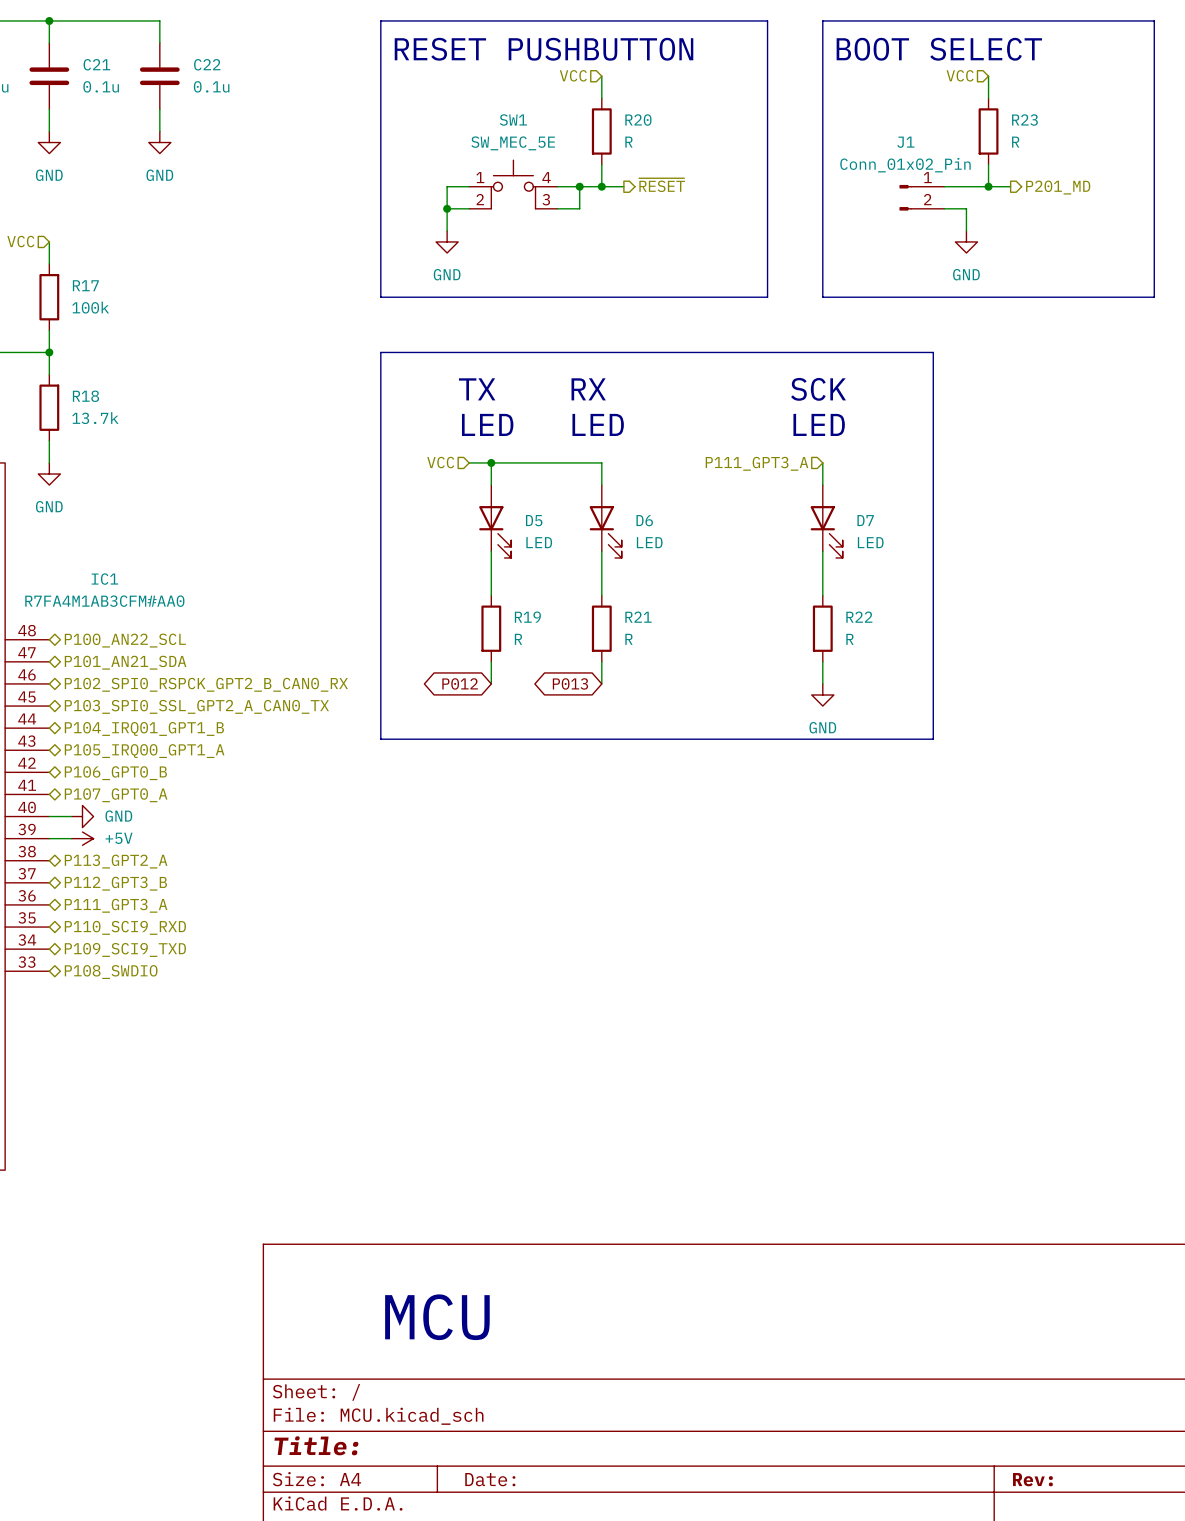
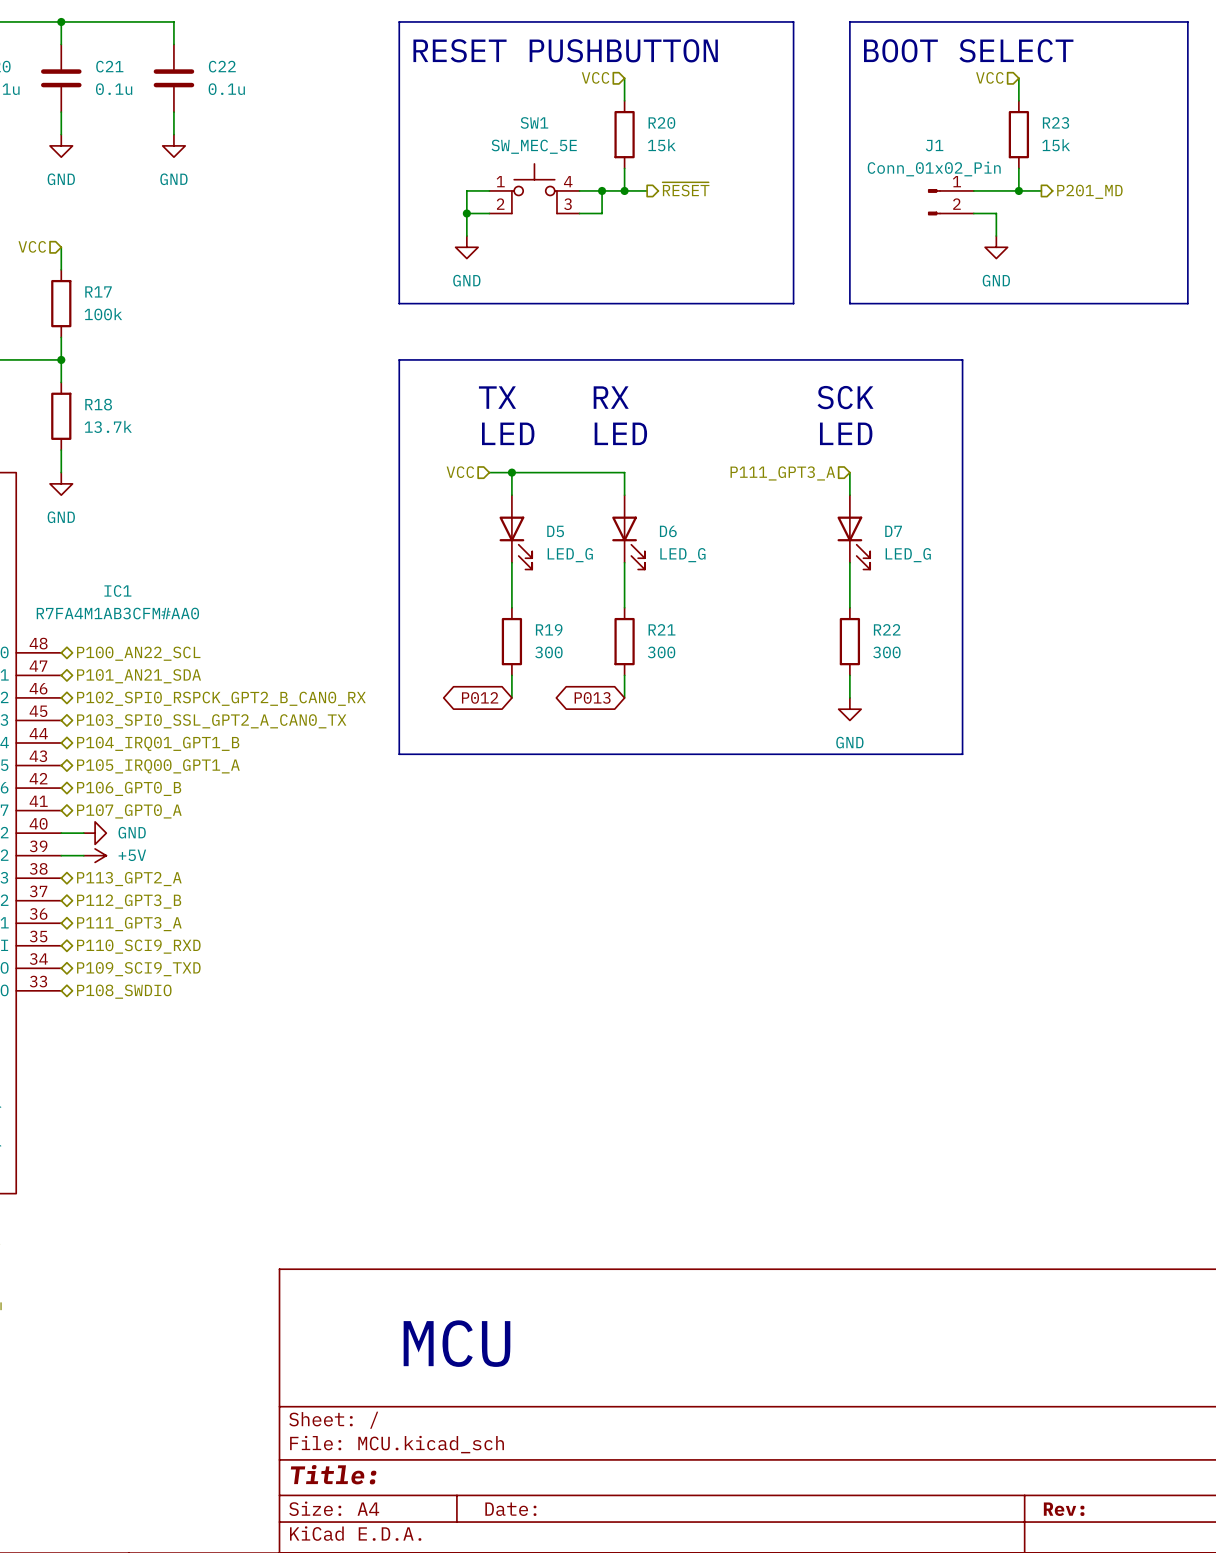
R20 value: R (628, 142) -> 15k (661, 145)
R23 value: R (1015, 142) -> 15k (1056, 145)
D5 value: LED (539, 542) -> LED_G (570, 555)
D6 value: LED (649, 542) -> LED_G (682, 555)
D7 value: LED (870, 542) -> LED_G (908, 555)
R19 value: R (518, 639) -> 300 (548, 652)
R21 value: R (628, 639) -> 300 (661, 652)
R22 value: R (849, 639) -> 300 (886, 652)

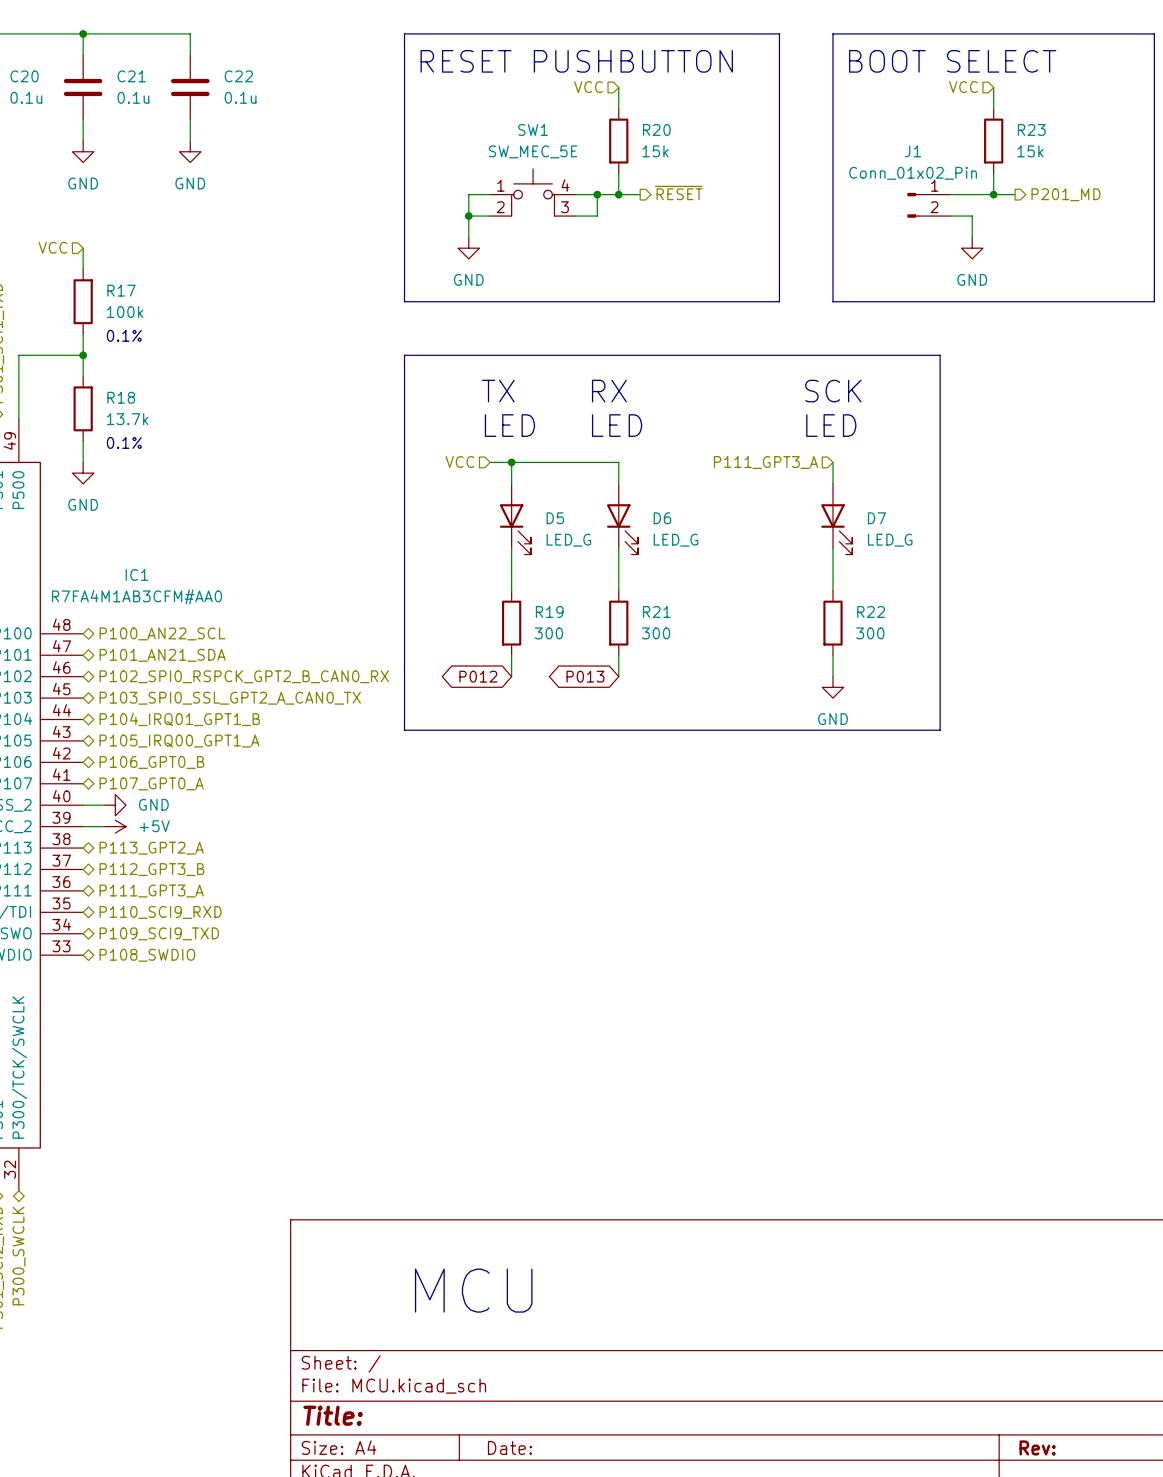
text: none -> 0.1% (124, 335)
text: none -> 0.1% (124, 442)

